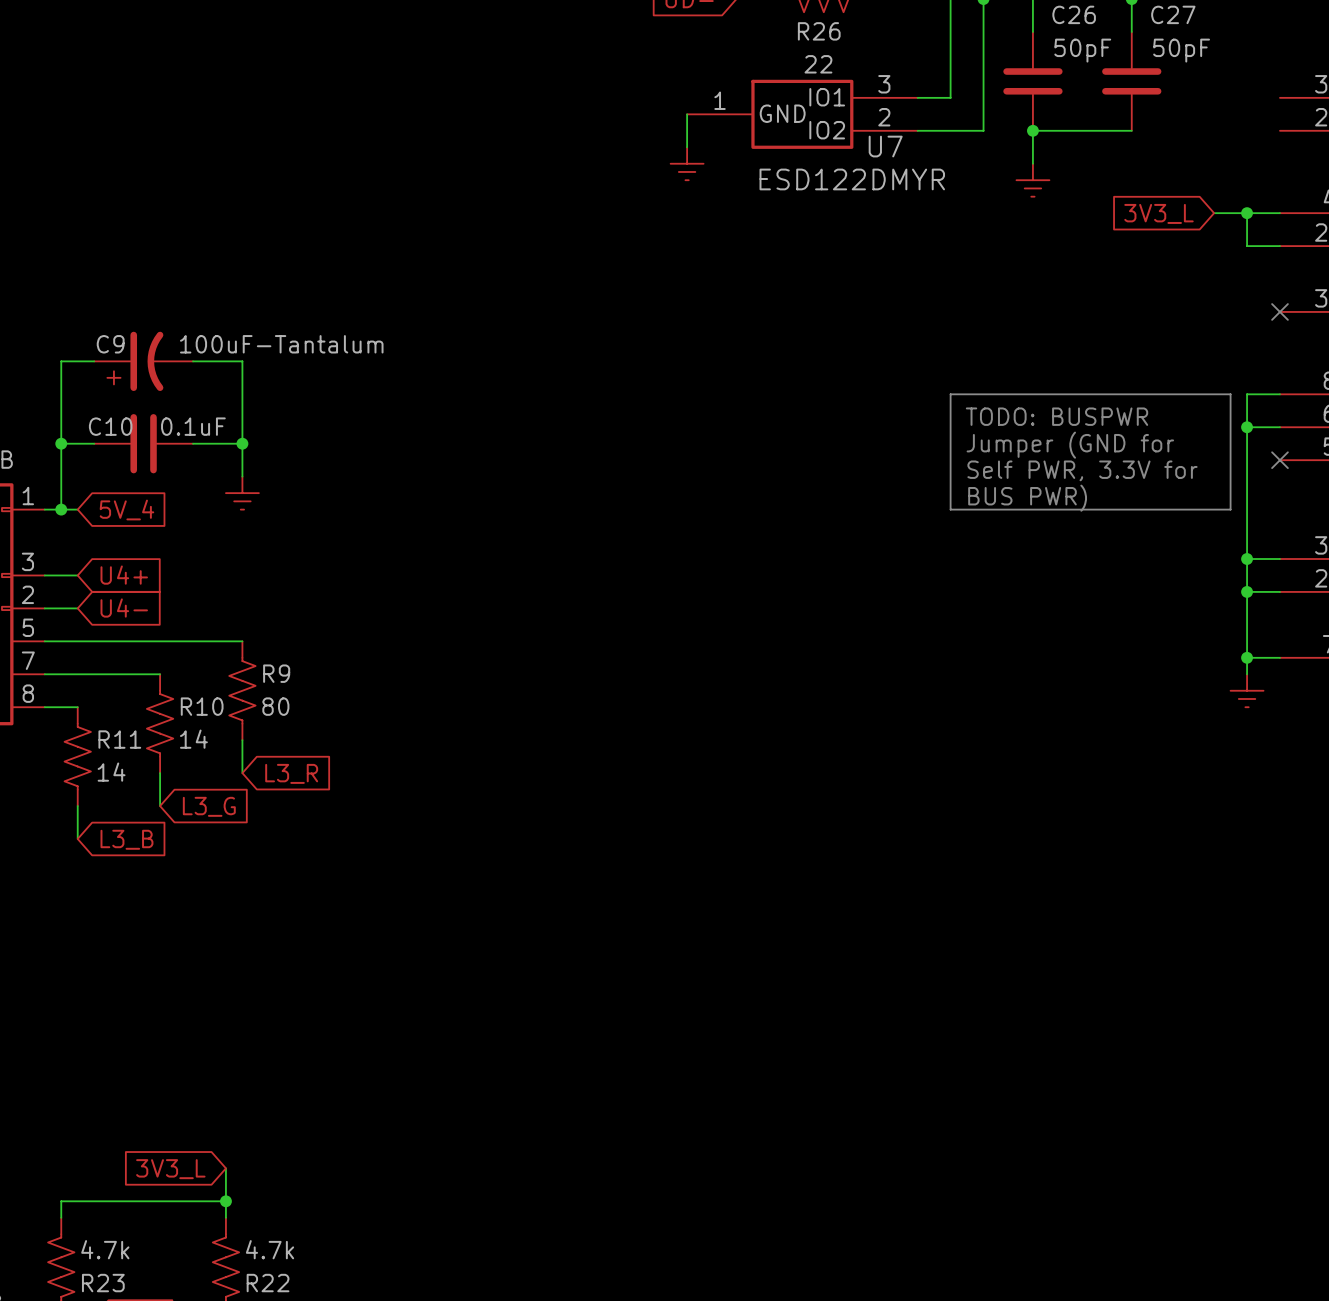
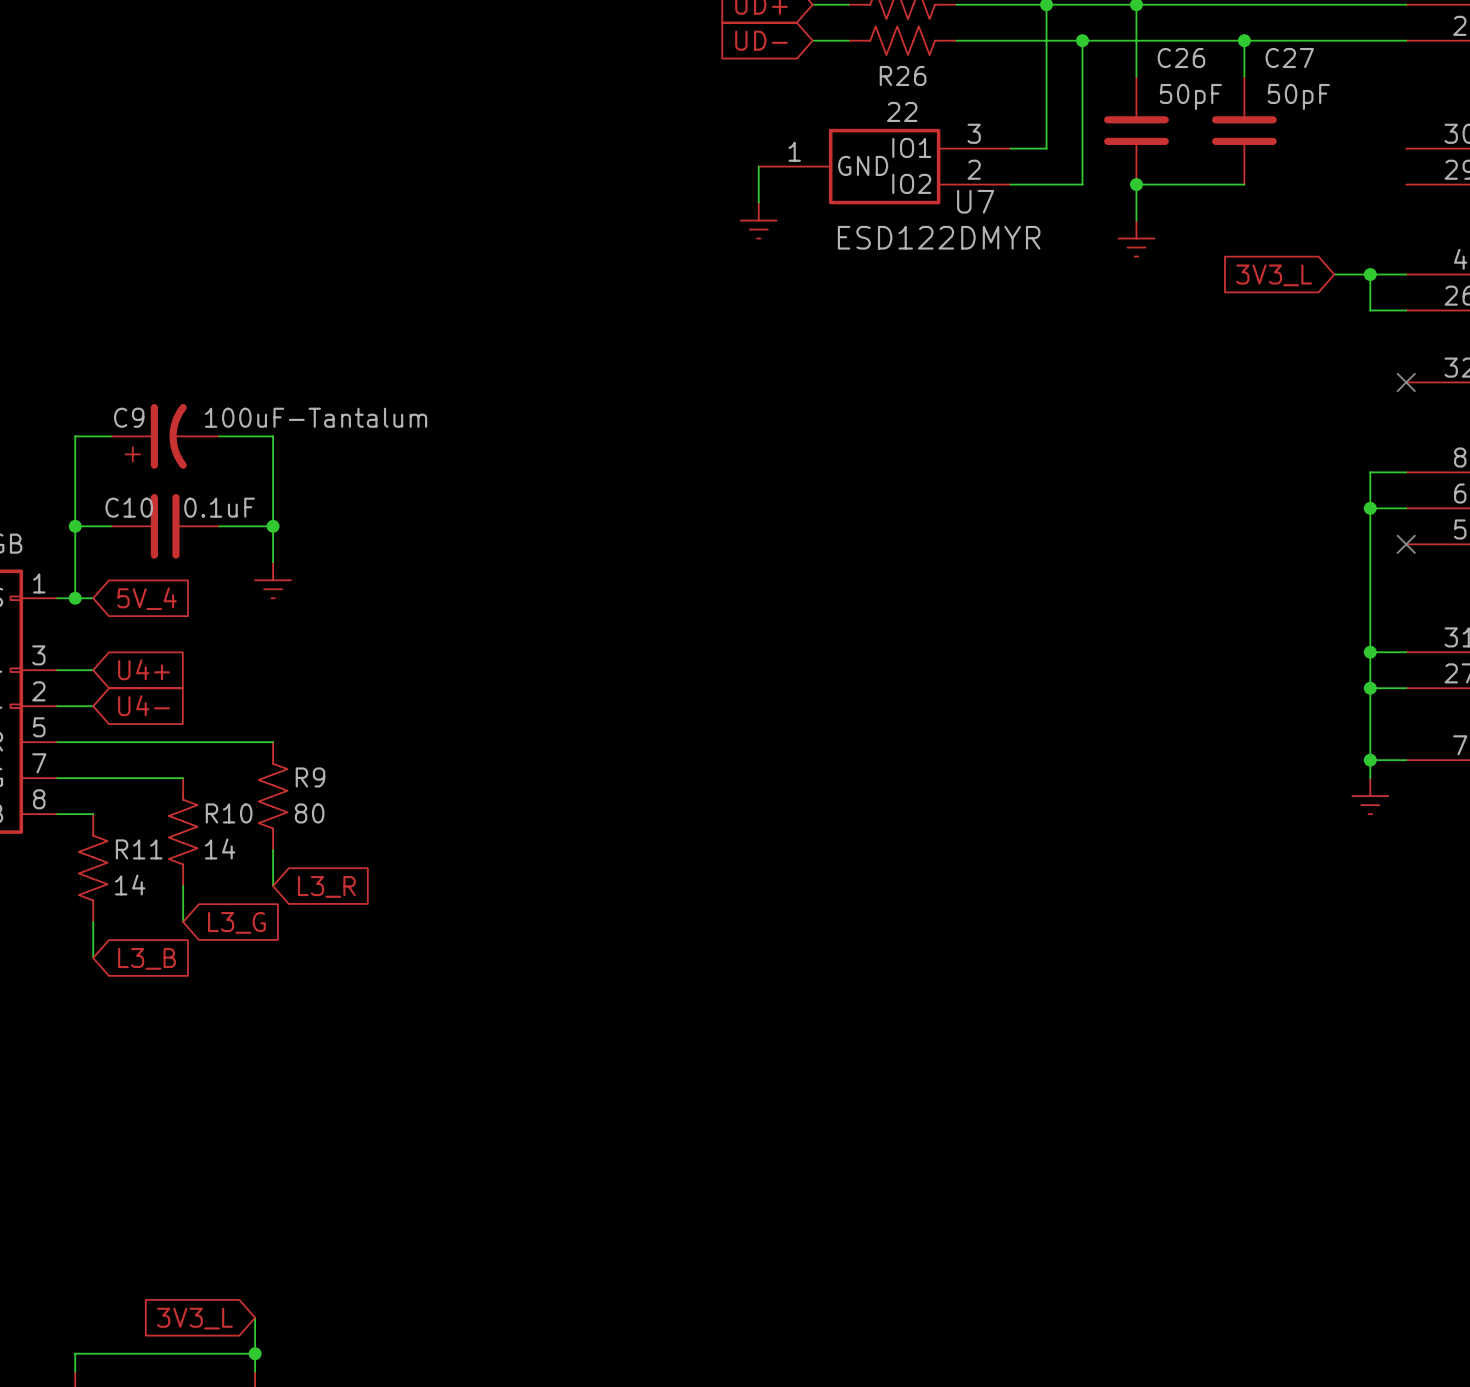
line: (950, 394) (1230, 394) (1230, 509) (950, 509) (950, 394) -> none
text: TODO: BUSPWR (1057, 416) -> none
text: Jumper (GND for (1070, 445) -> none
text: Self PWR, 3.3V for (1082, 470) -> none
text: BUS PWR) (1027, 498) -> none

